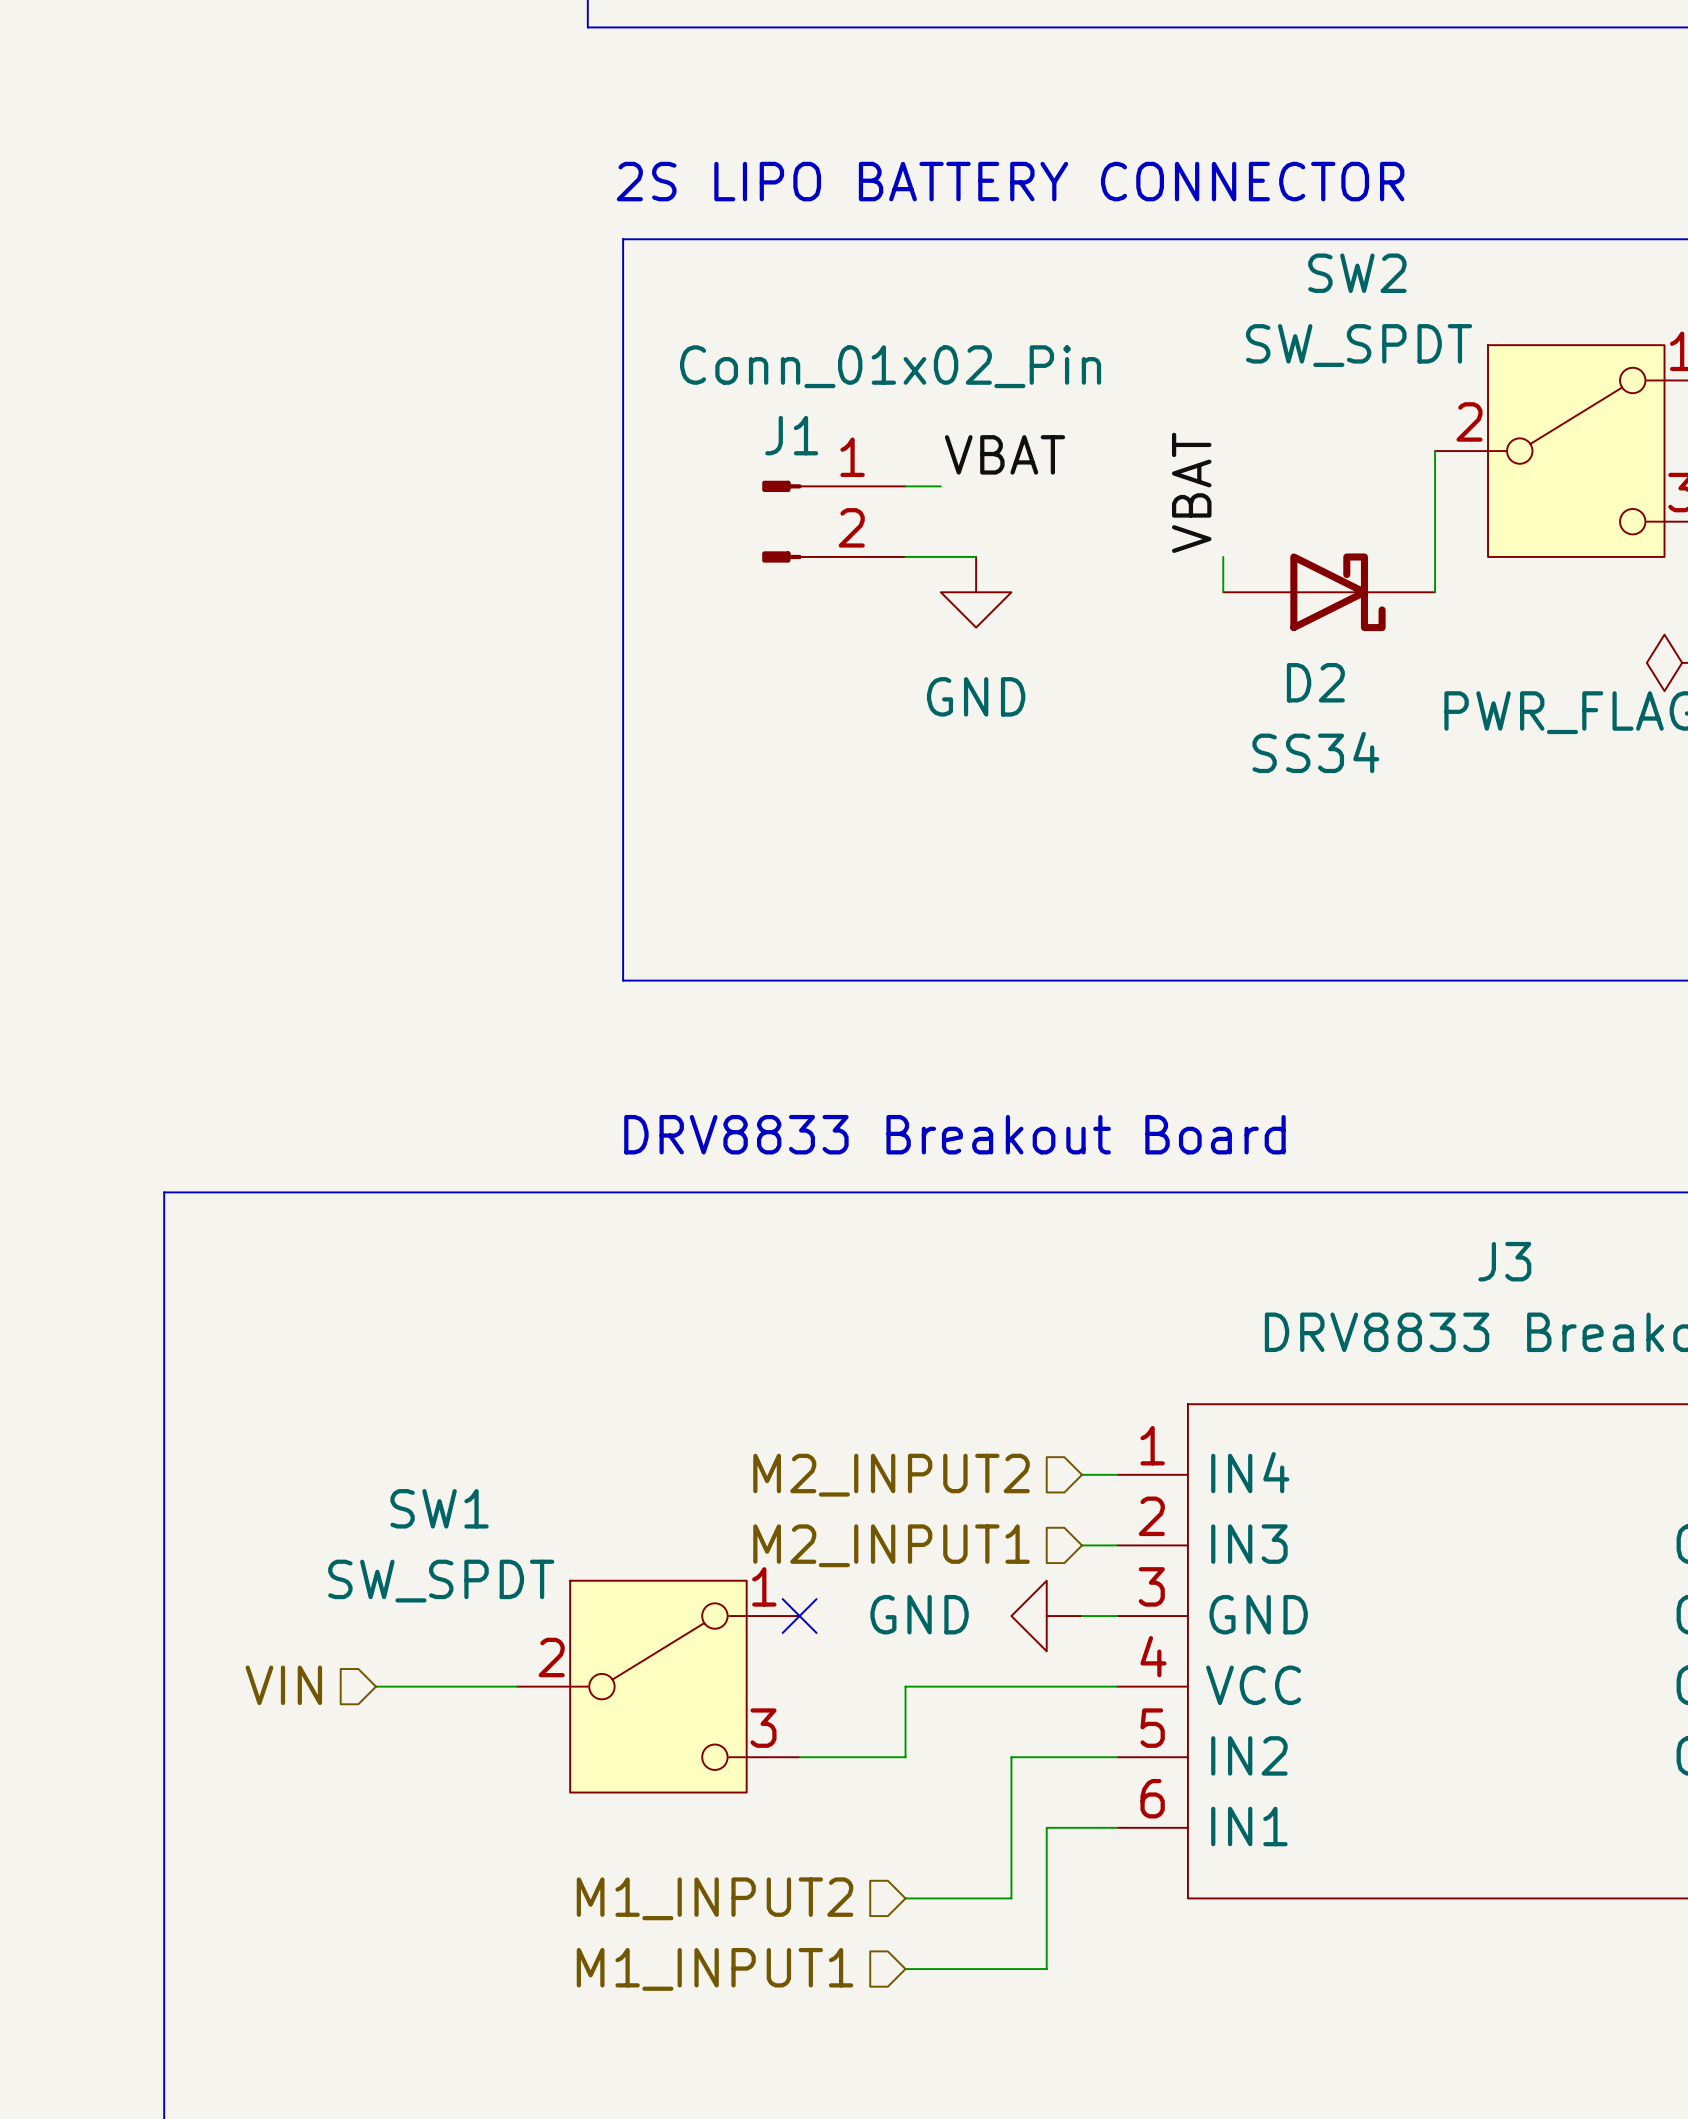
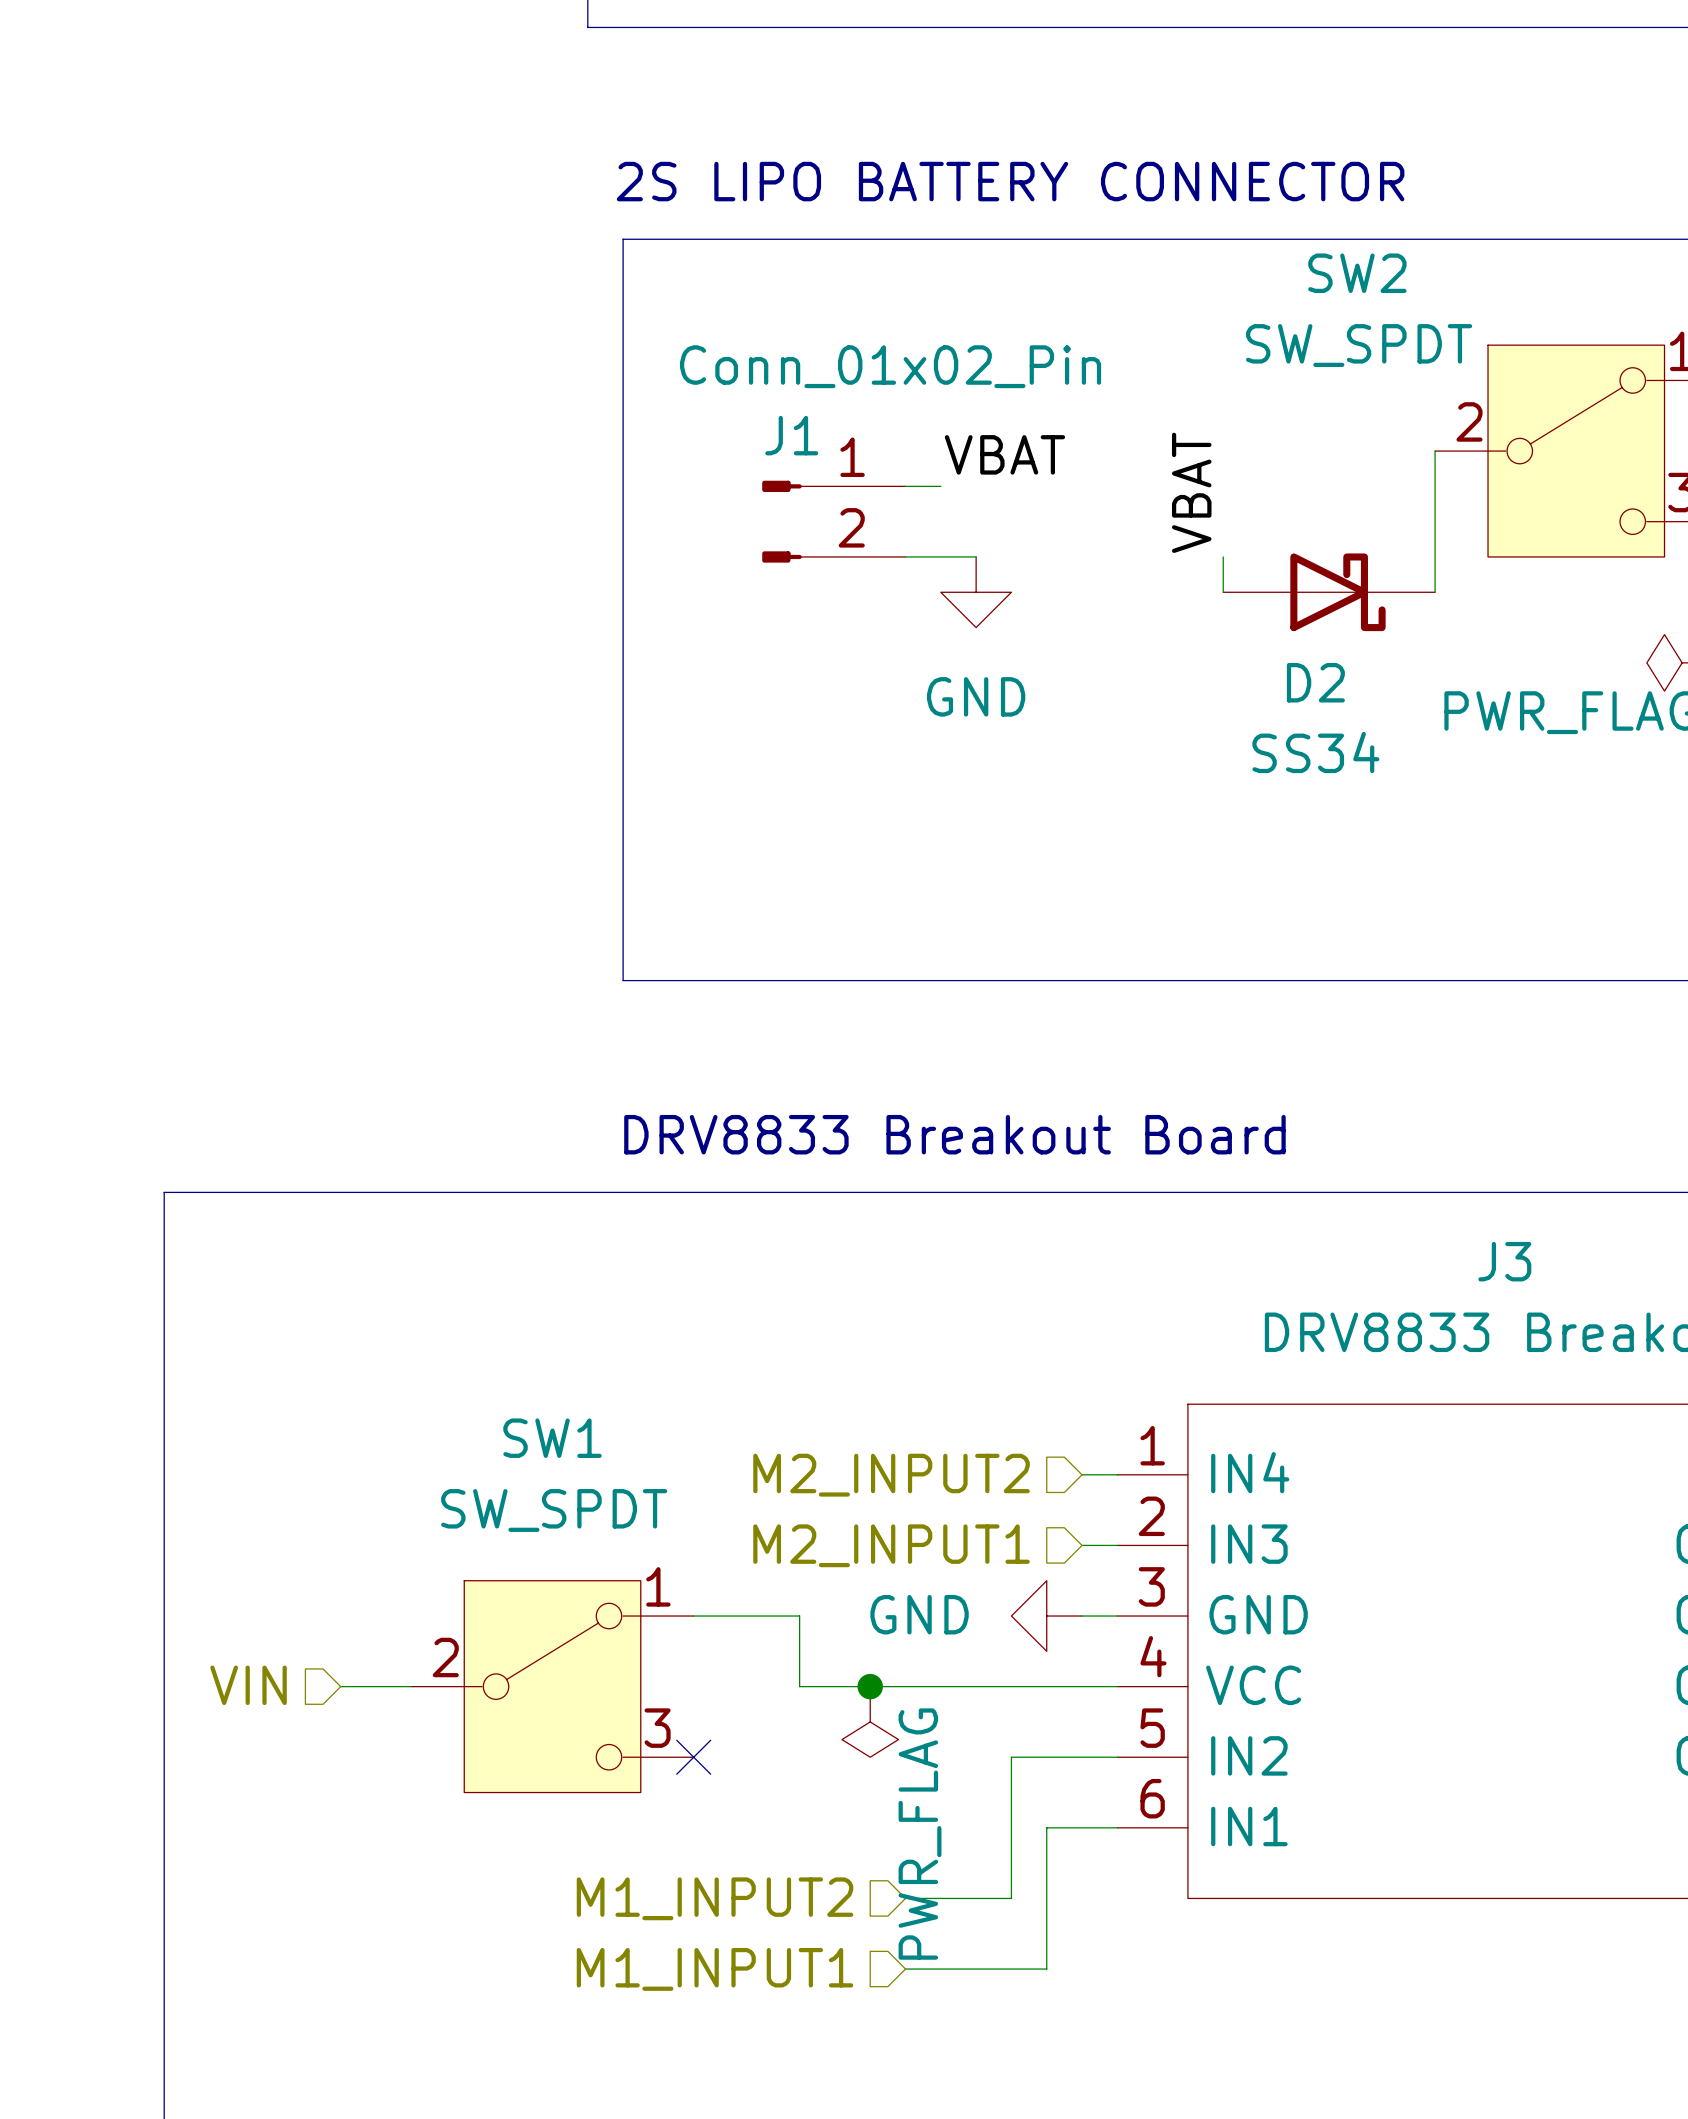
SW1 name position: SW1 (439, 1508) -> SW1 (552, 1438)
SW1 value position: SW_SPDT (441, 1581) -> SW_SPDT (554, 1510)
no-connect mark: (799, 1616) -> none
hierarchical label position: VIN (283, 1685) -> VIN (248, 1685)
wire: none -> (340, 1686) (376, 1686)
SW1 position: (658, 1686) -> (552, 1686)
junction: none -> (870, 1686)
wire: (905, 1686) (905, 1757) (799, 1757) -> (905, 1686) (799, 1686) (799, 1616) (693, 1616)
power symbol: none -> PWR_FLAG (870, 1721)
no-connect mark: none -> (693, 1757)

